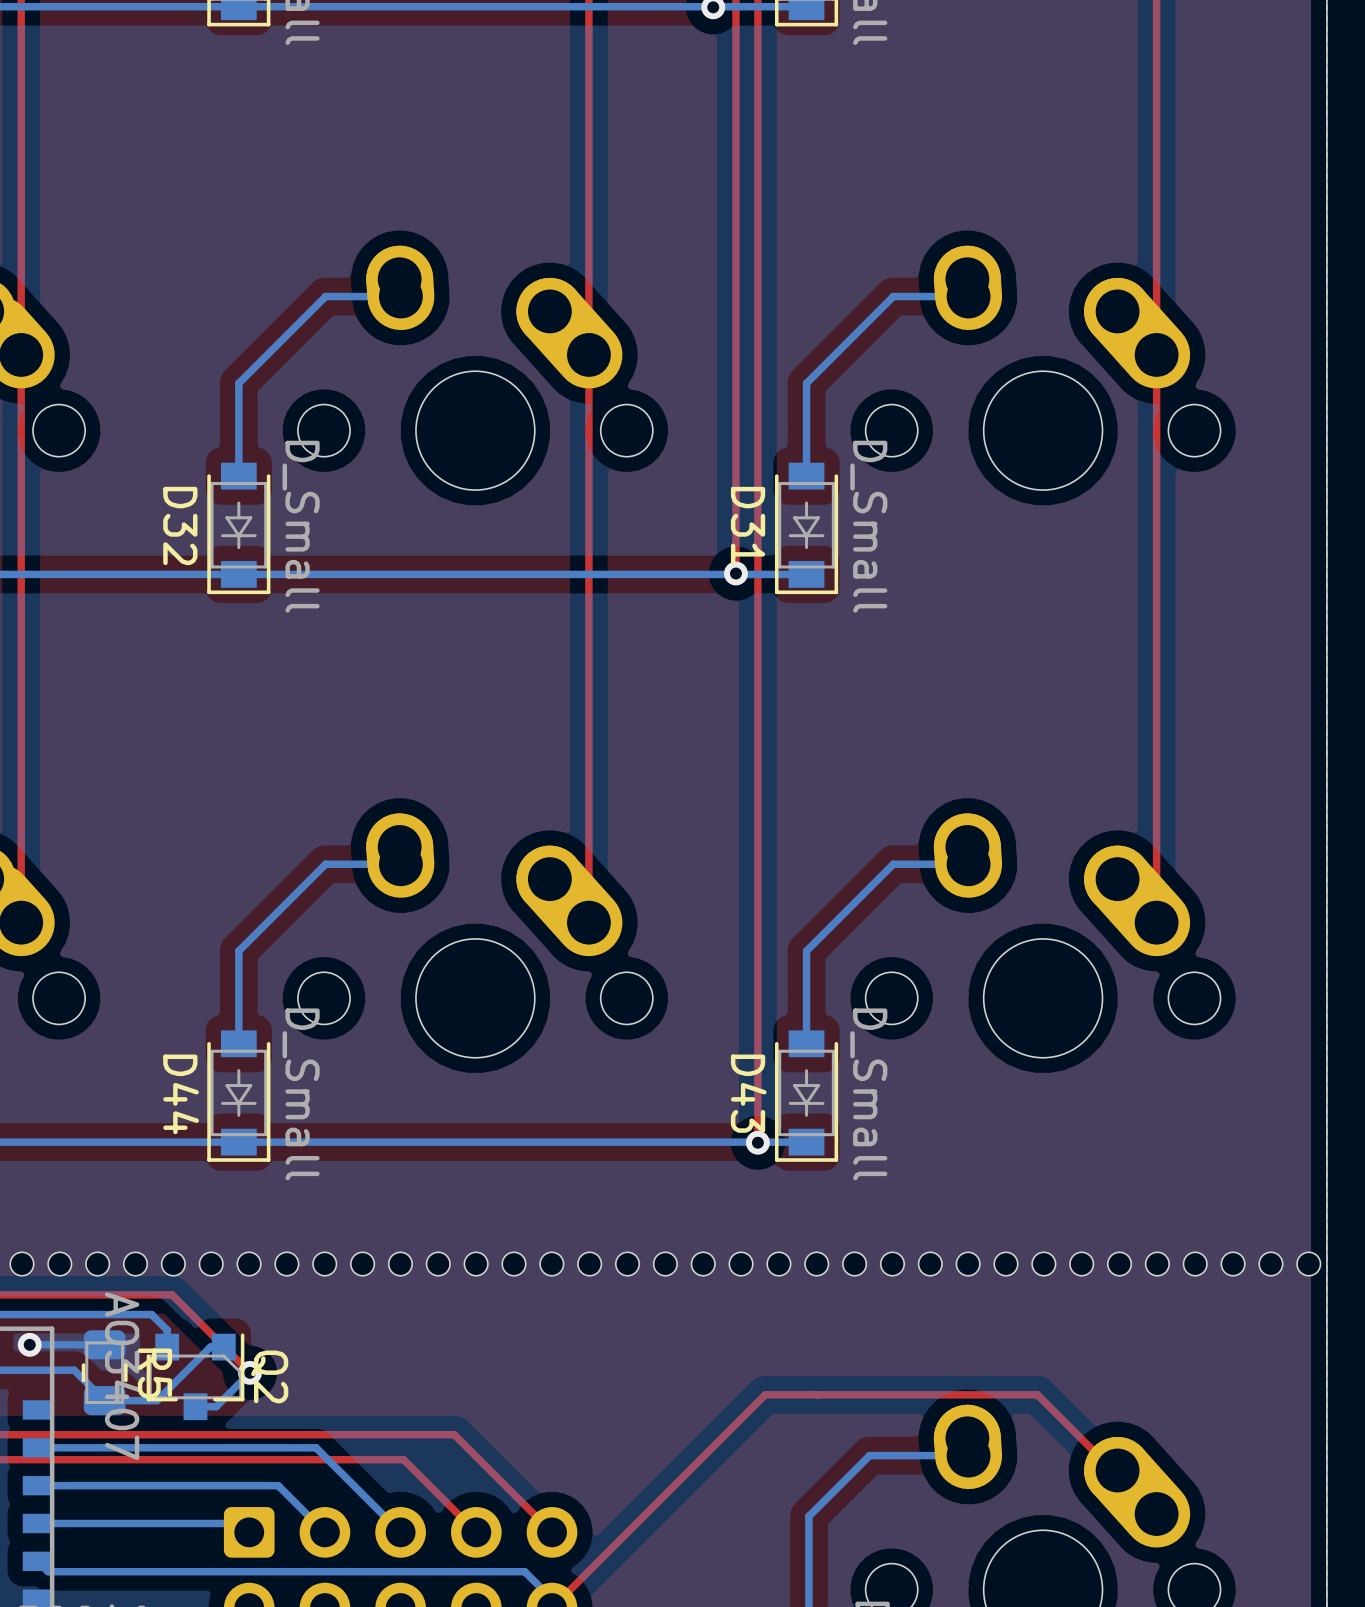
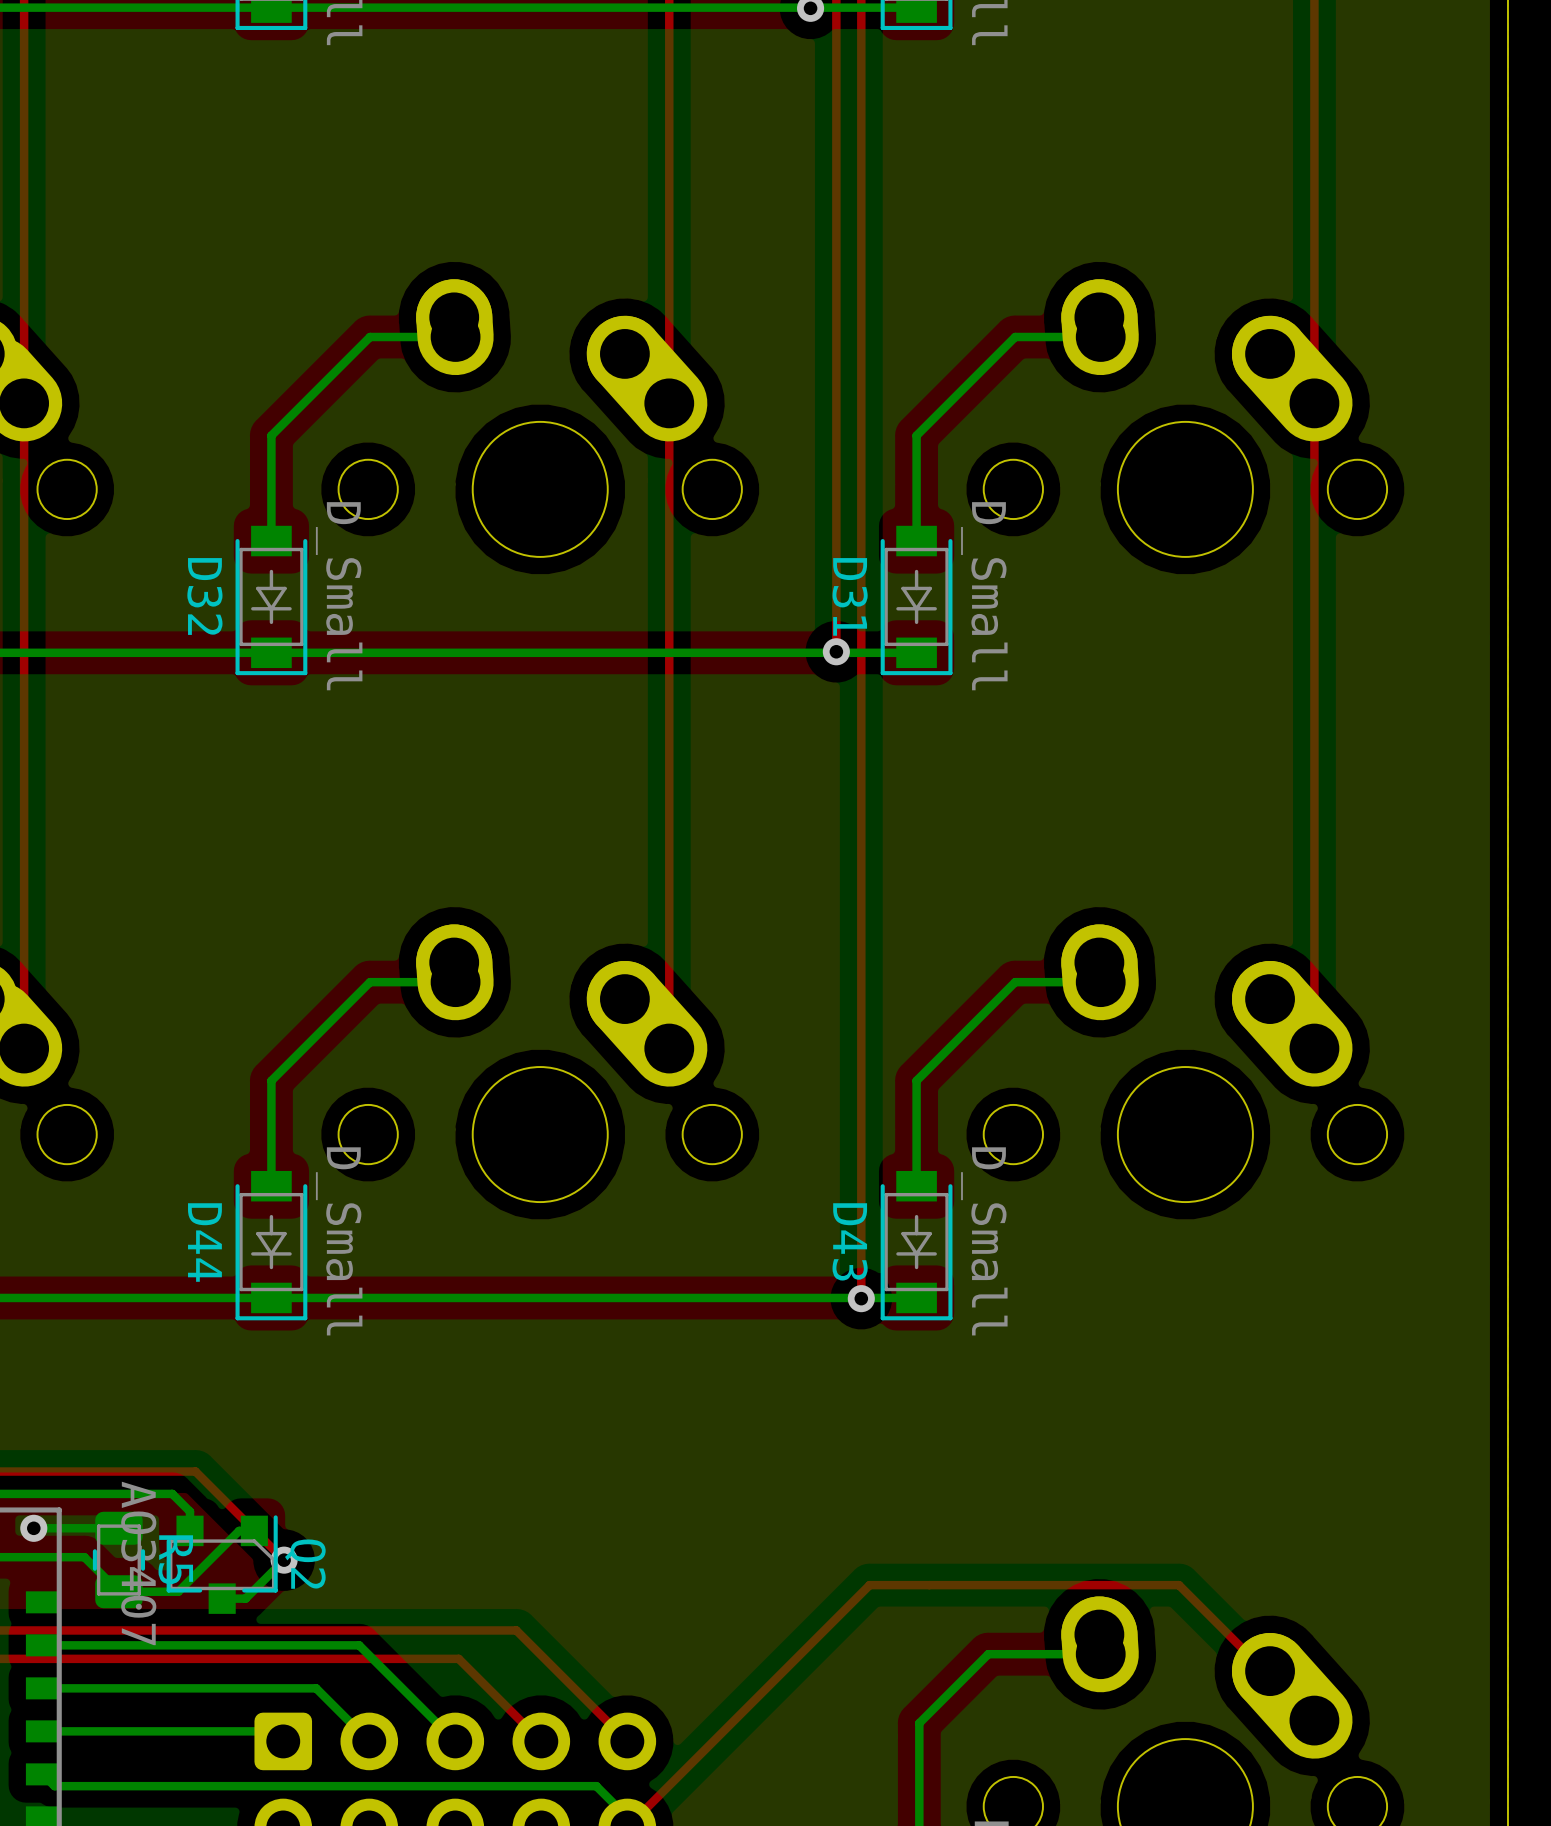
part: (97, 1264) -> none
part: (286, 1264) -> none
part: (476, 1264) -> none
part: (665, 1264) -> none
part: (854, 1264) -> none
part: (1043, 1264) -> none
part: (1233, 1264) -> none

